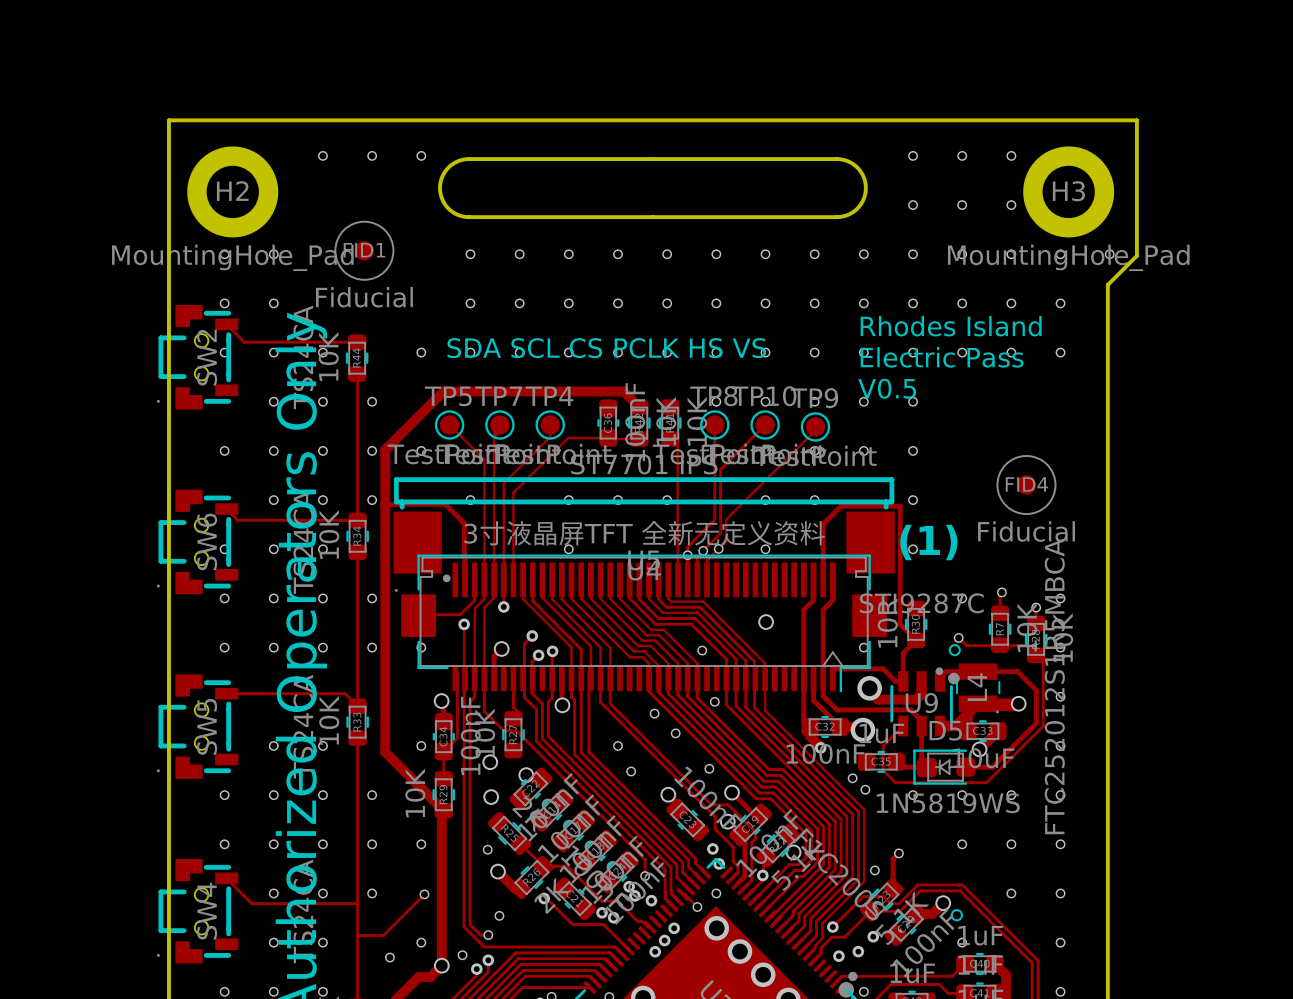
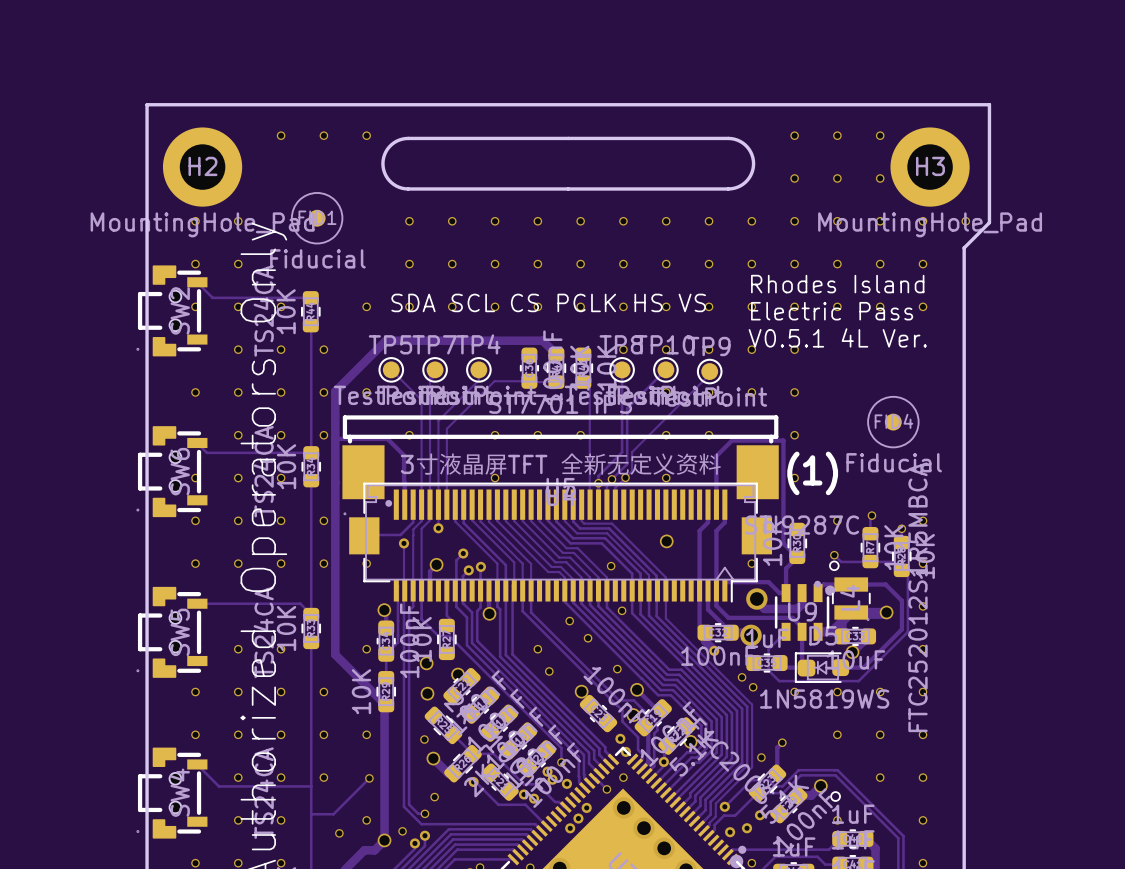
text: V0.5 (887, 388) -> V0.5.1 4L Ver. (837, 337)

